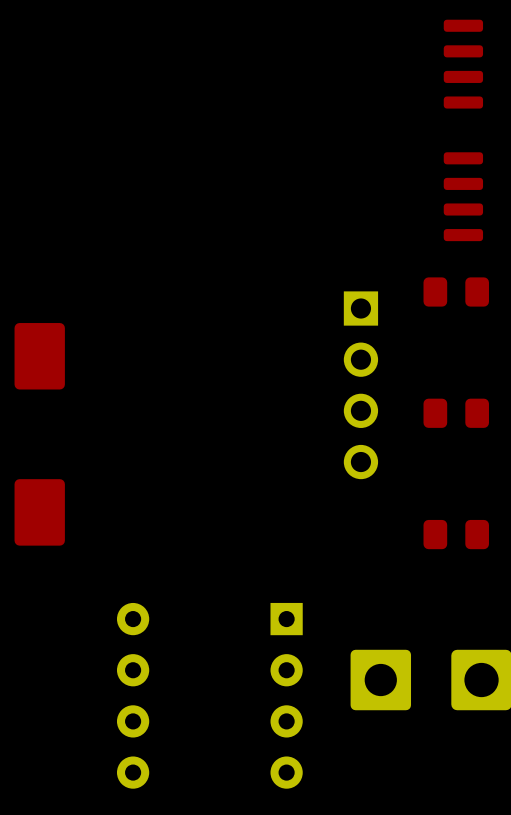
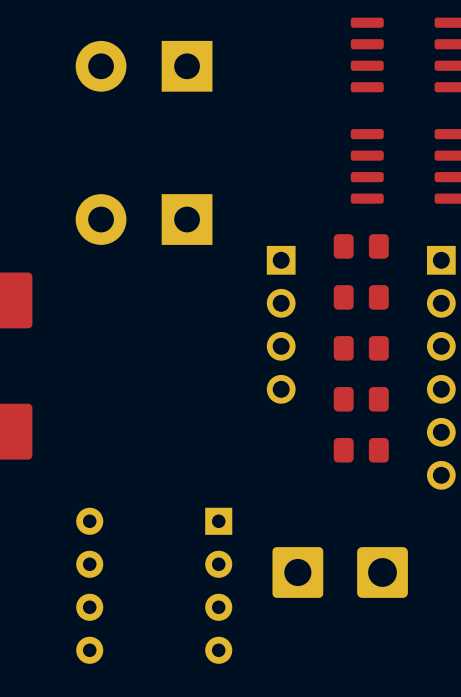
part: none -> (144, 66)
part: none -> (144, 219)
part: none -> (361, 297)
part: none -> (361, 399)

